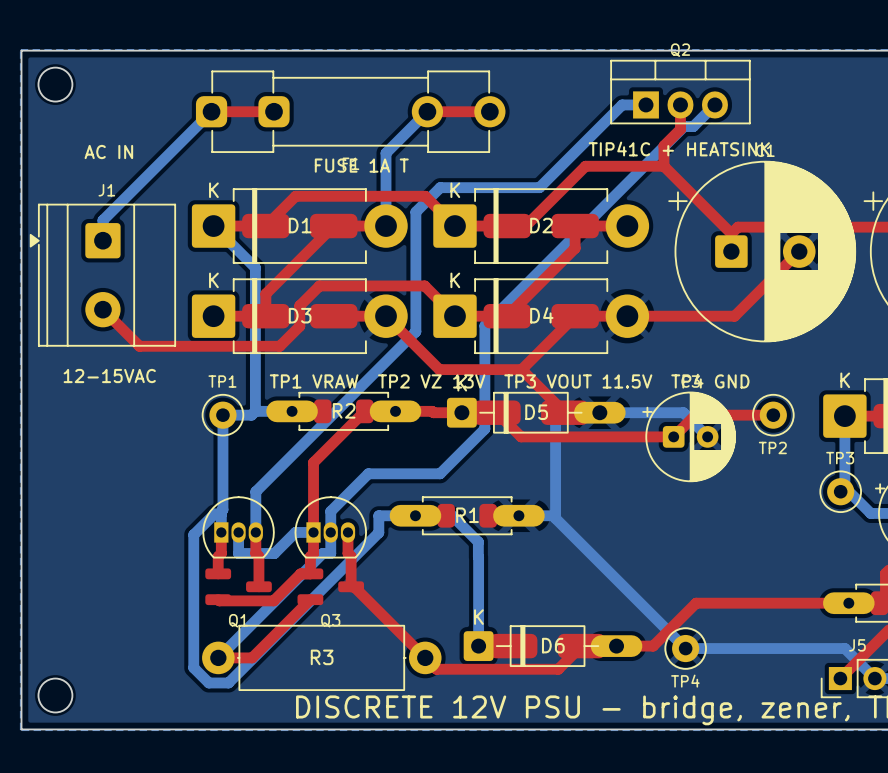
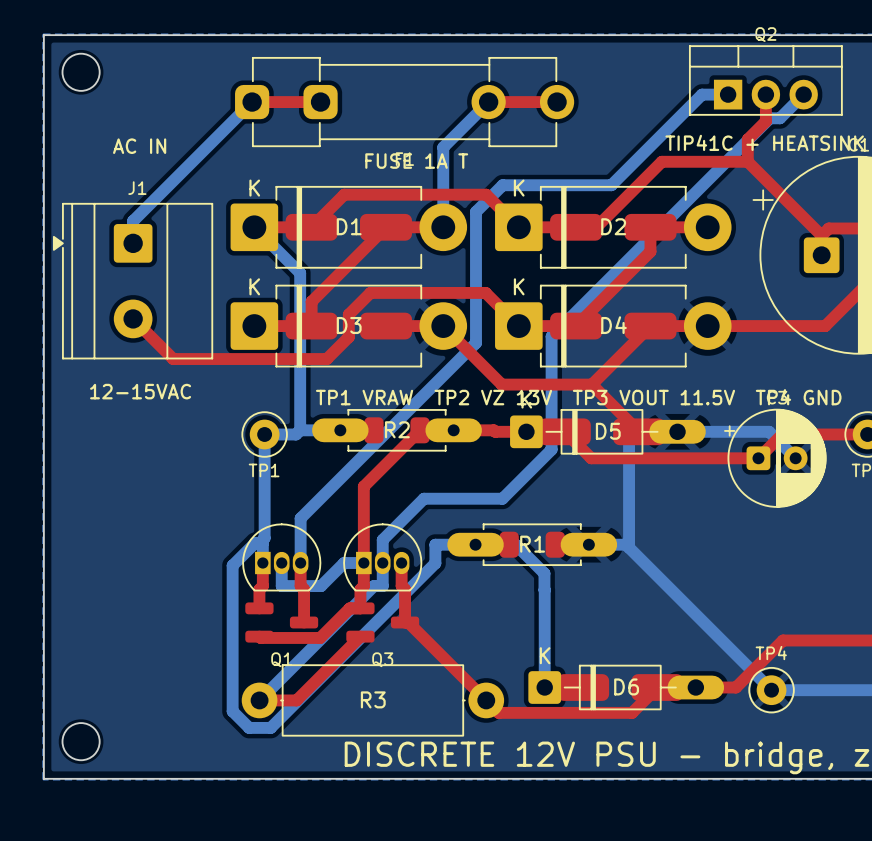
TP1 name position: TP1 (222, 381) -> TP1 (264, 470)
TP4 name position: TP4 (685, 681) -> TP4 (771, 653)

